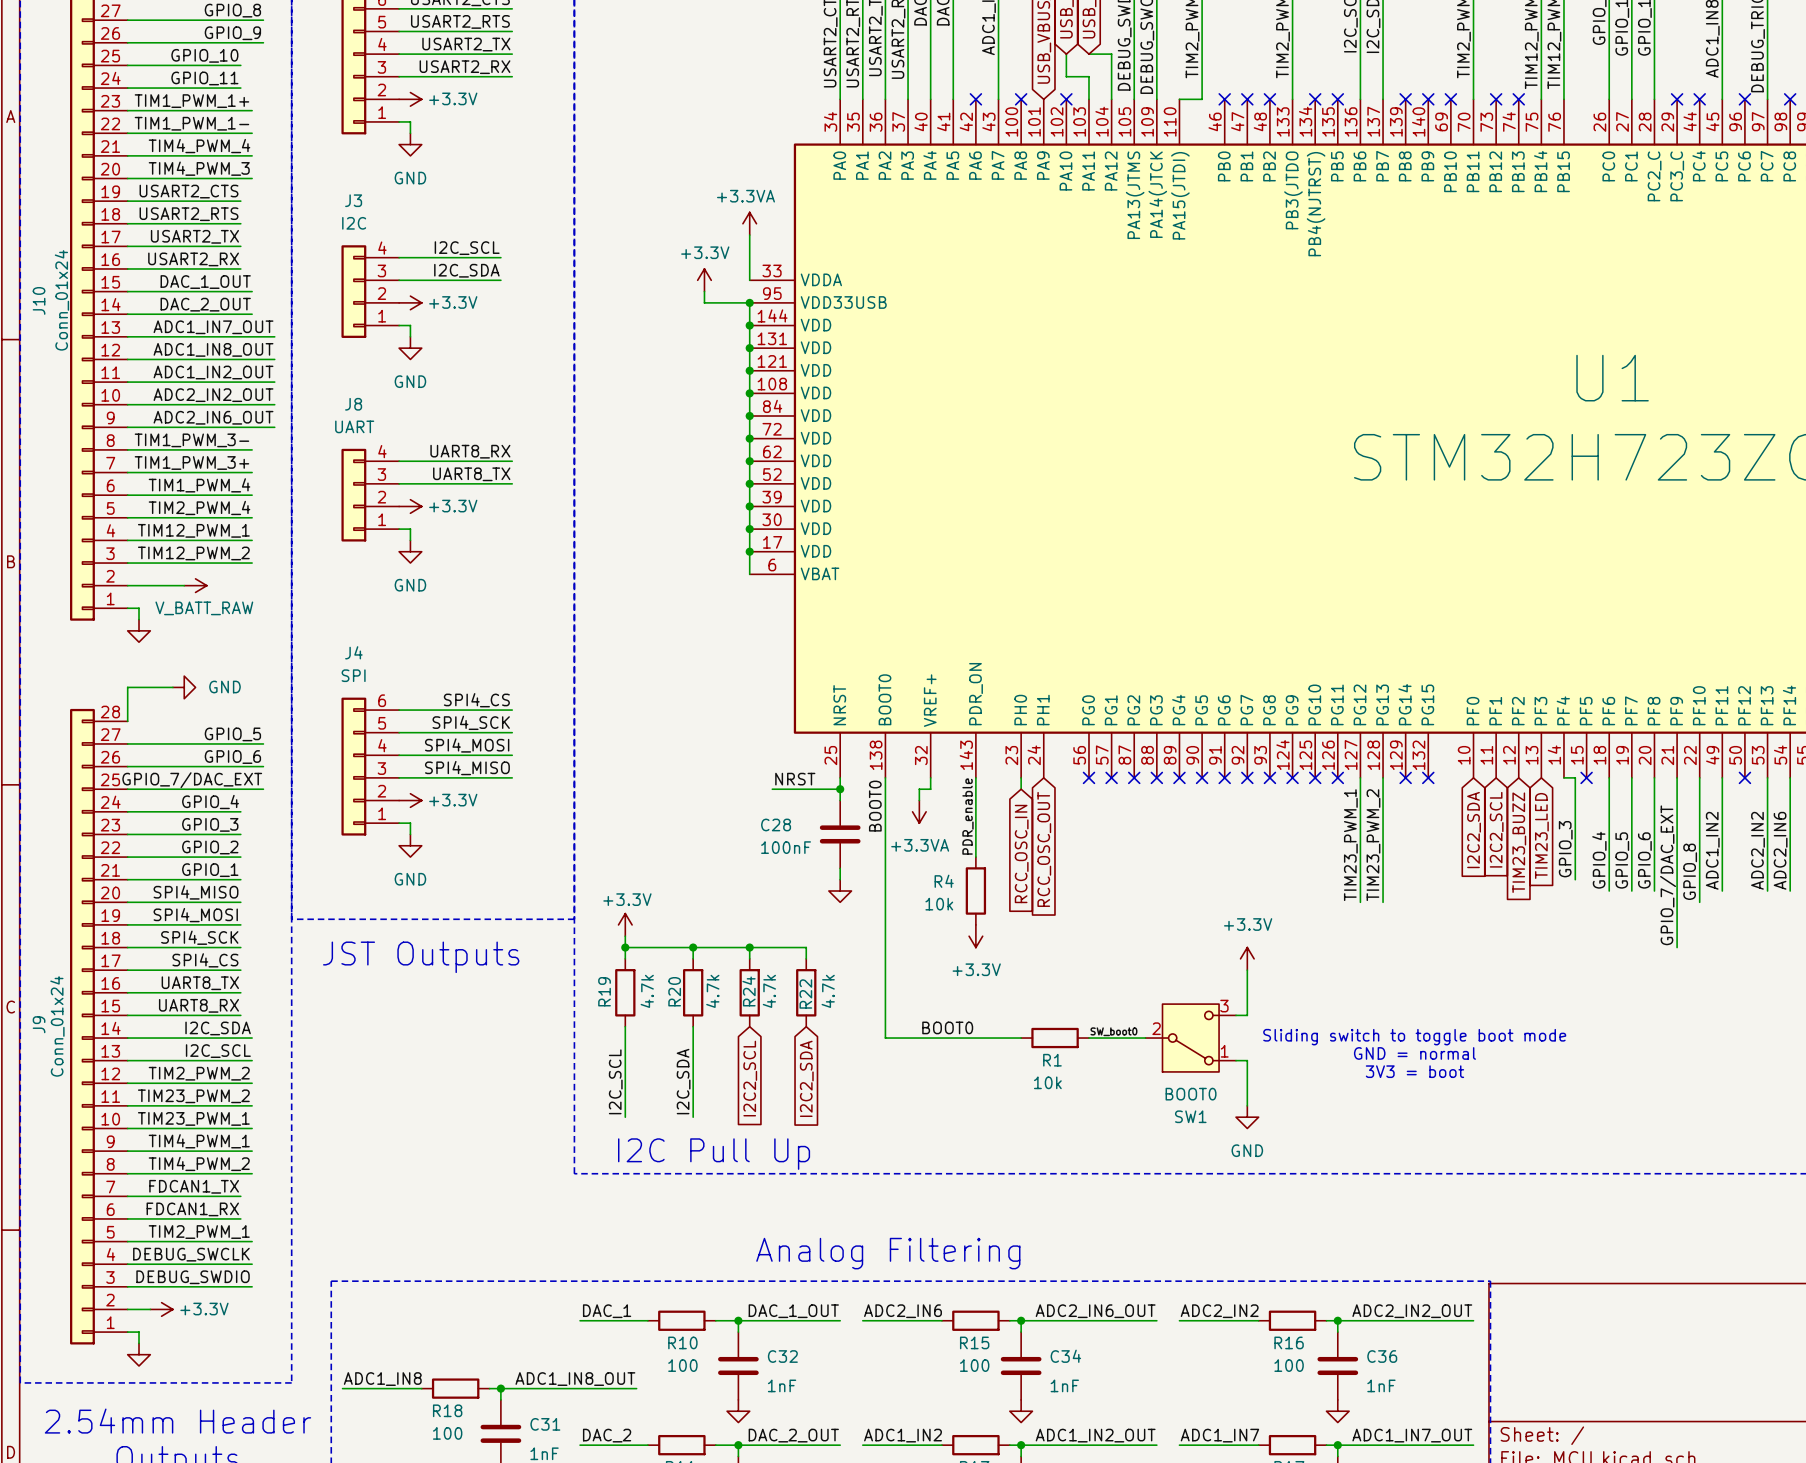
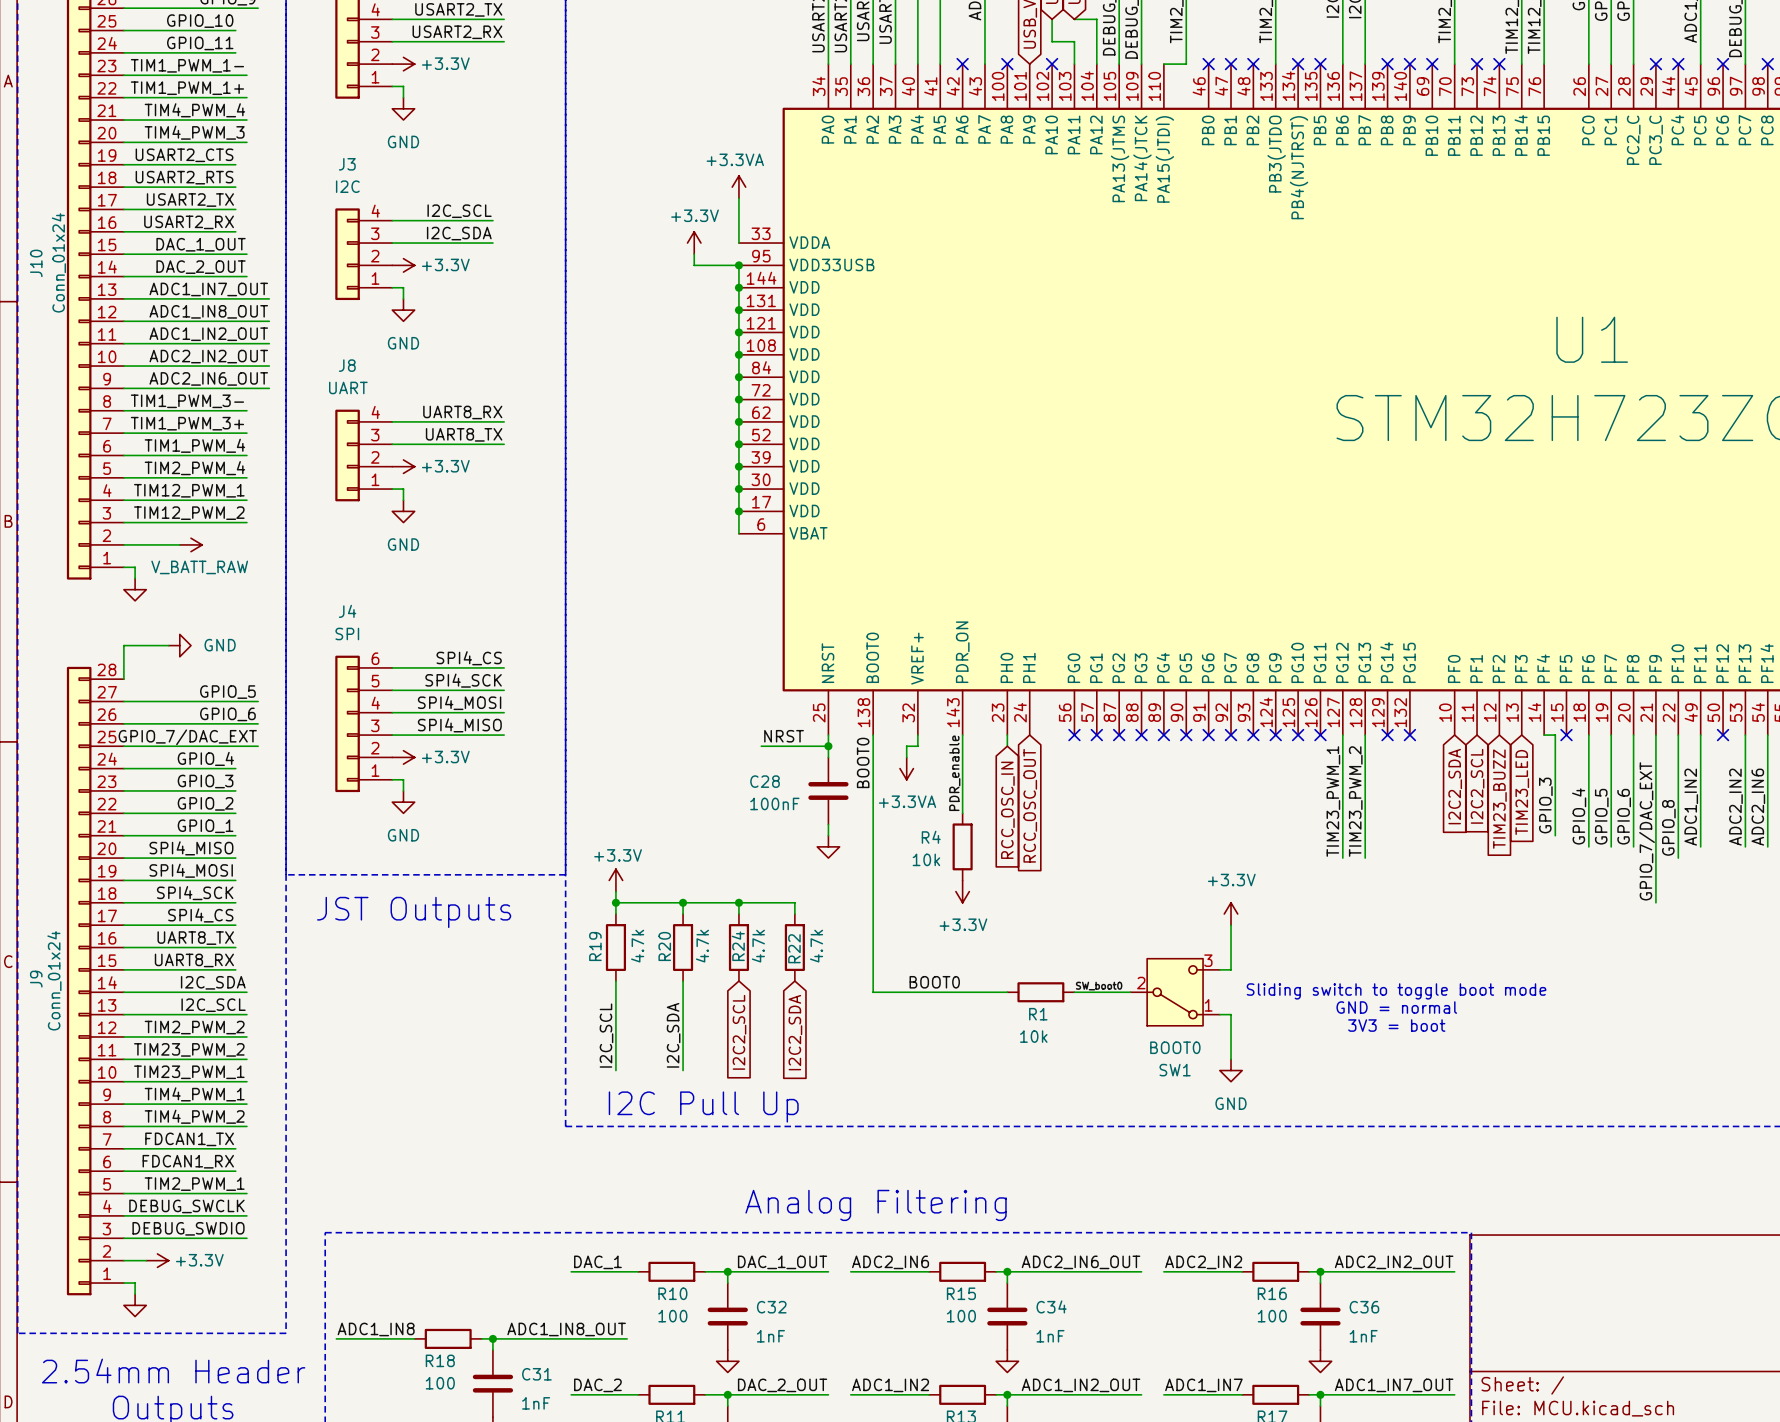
label: TIM1_PWM_1+ (191, 101) -> TIM1_PWM_1- (187, 65)
label: TIM1_PWM_1- (191, 123) -> TIM1_PWM_1+ (187, 88)

